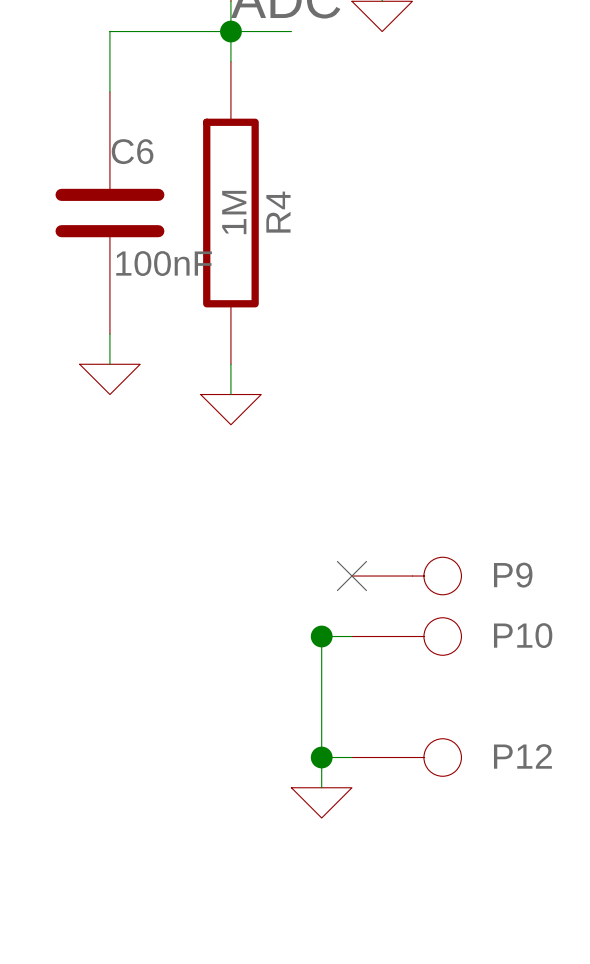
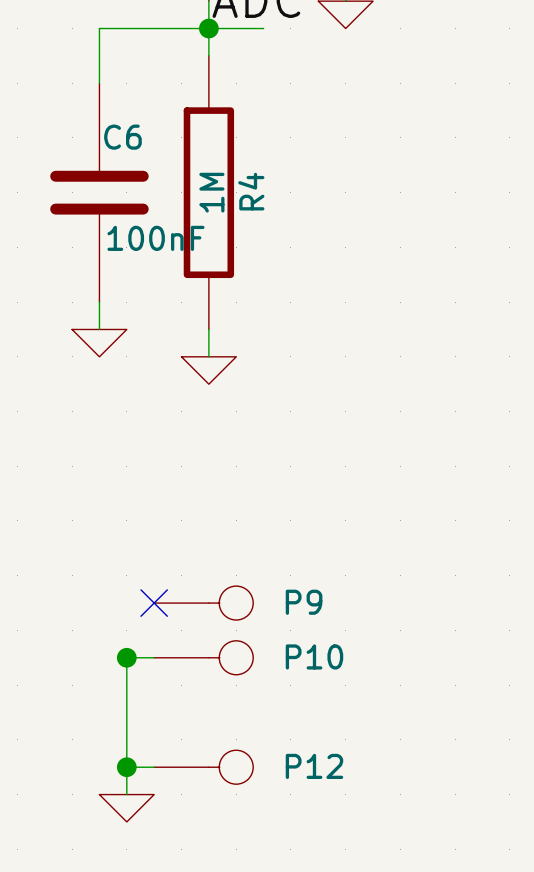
no-connect mark: (351, 576) -> none
P9 position: (406, 576) -> (203, 603)
junction: (321, 636) -> none
wire: (351, 636) (321, 636) (321, 787) -> (154, 657) (126, 657) (126, 794)
P10 position: (406, 636) -> (203, 657)
no-connect mark: none -> (154, 603)
junction: none -> (126, 657)
wire: (321, 757) (351, 757) -> (126, 767) (154, 767)
junction: (321, 757) -> none
P12 position: (406, 757) -> (203, 767)
power symbol position: (321, 802) -> (126, 808)
junction: none -> (126, 767)

